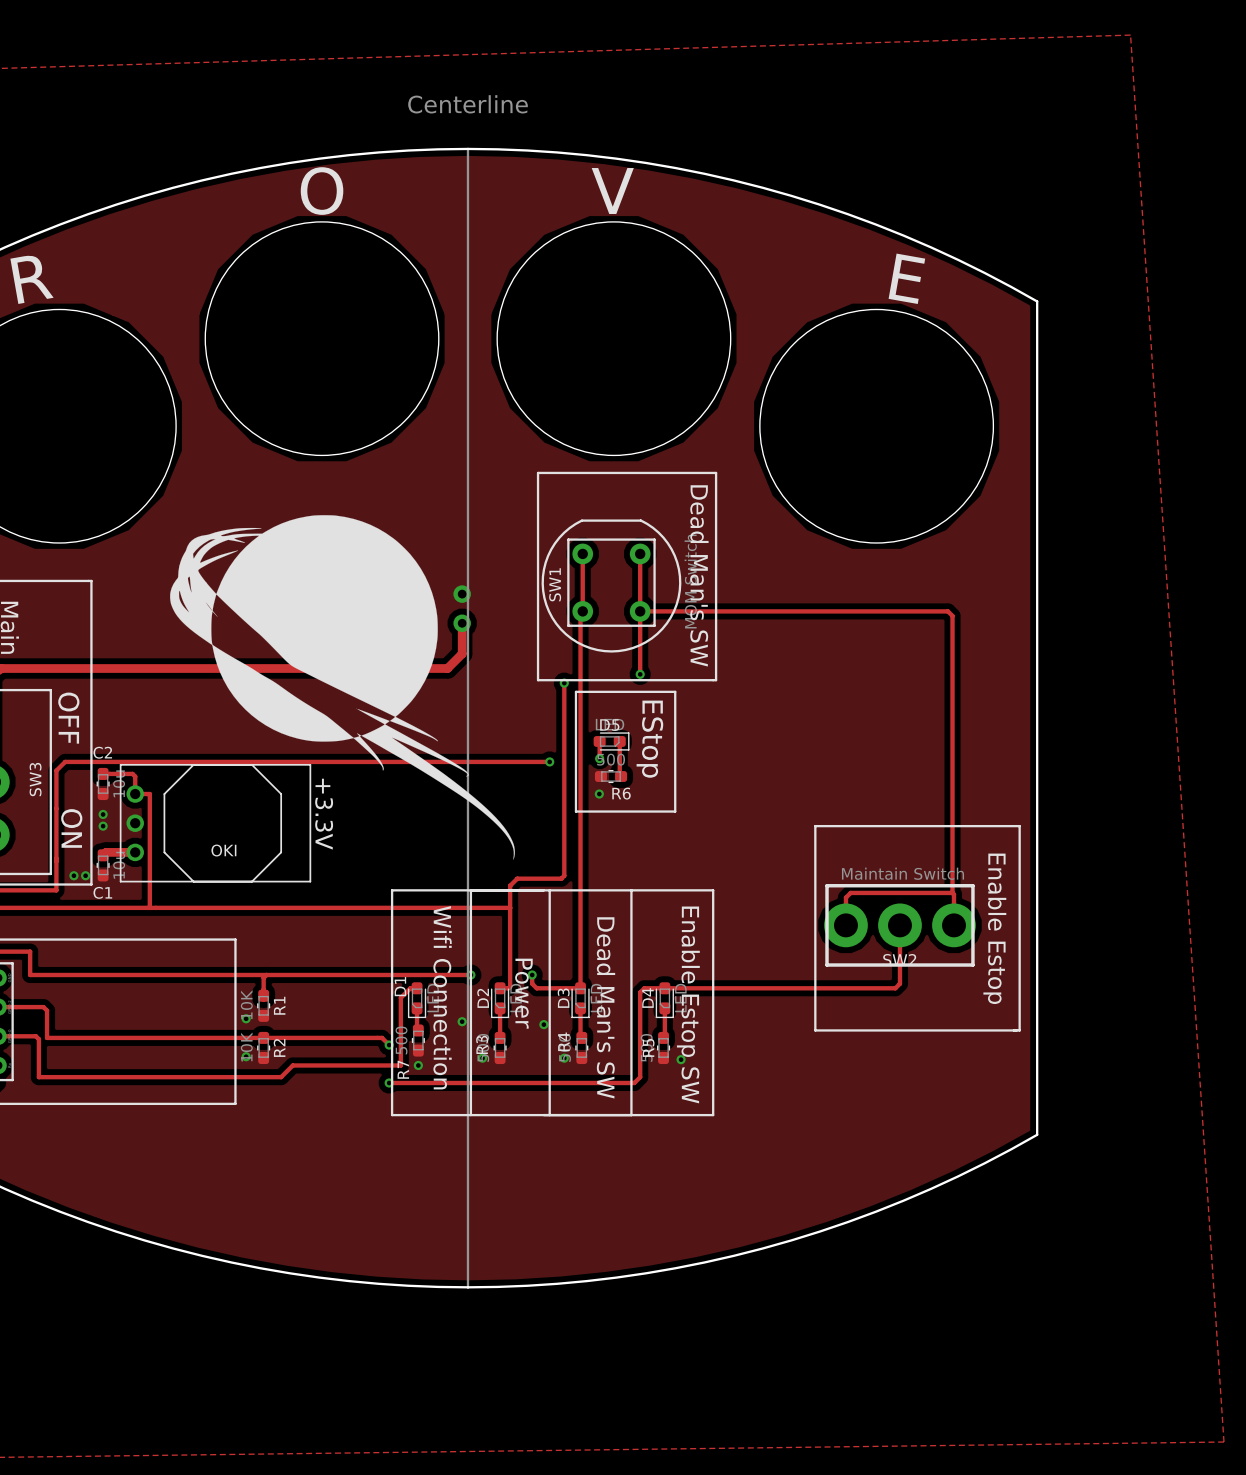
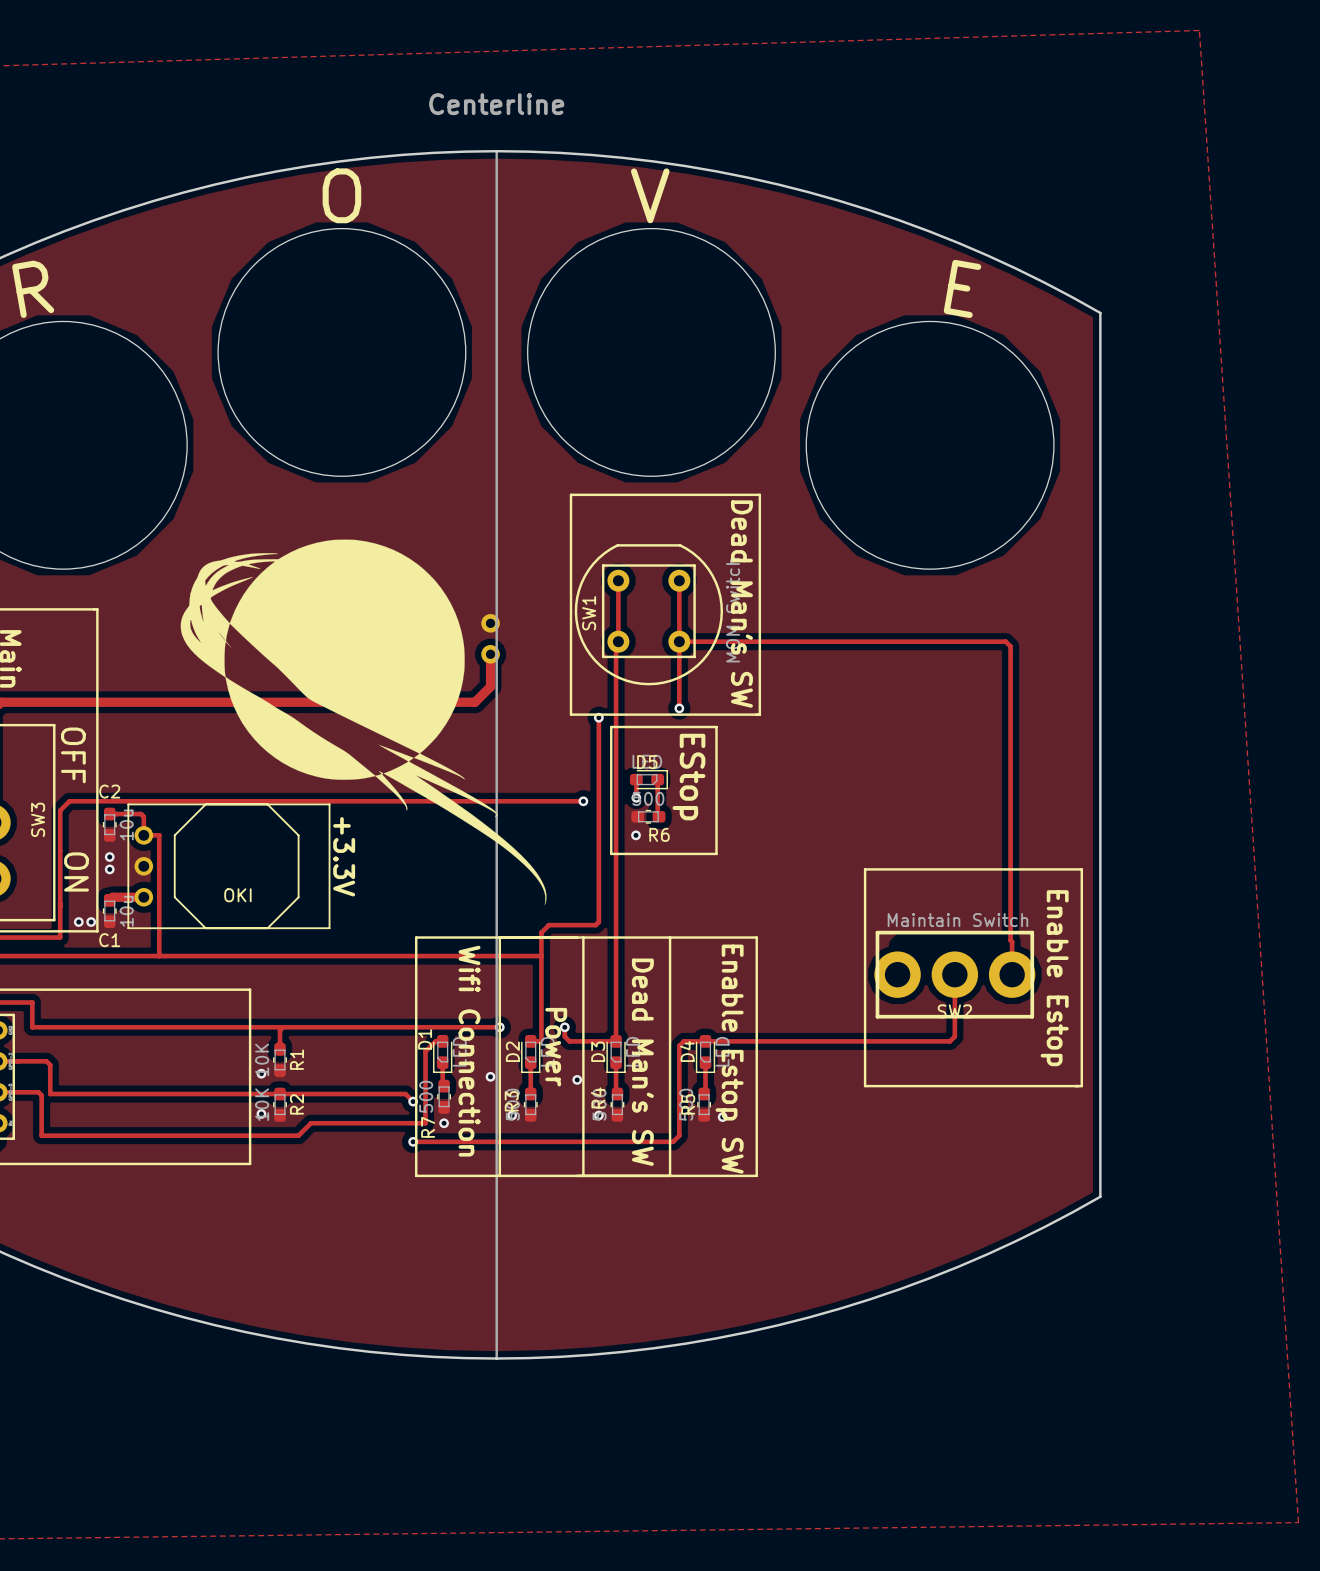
track: (952, 892) (850, 892) (845, 897) (845, 925) -> none

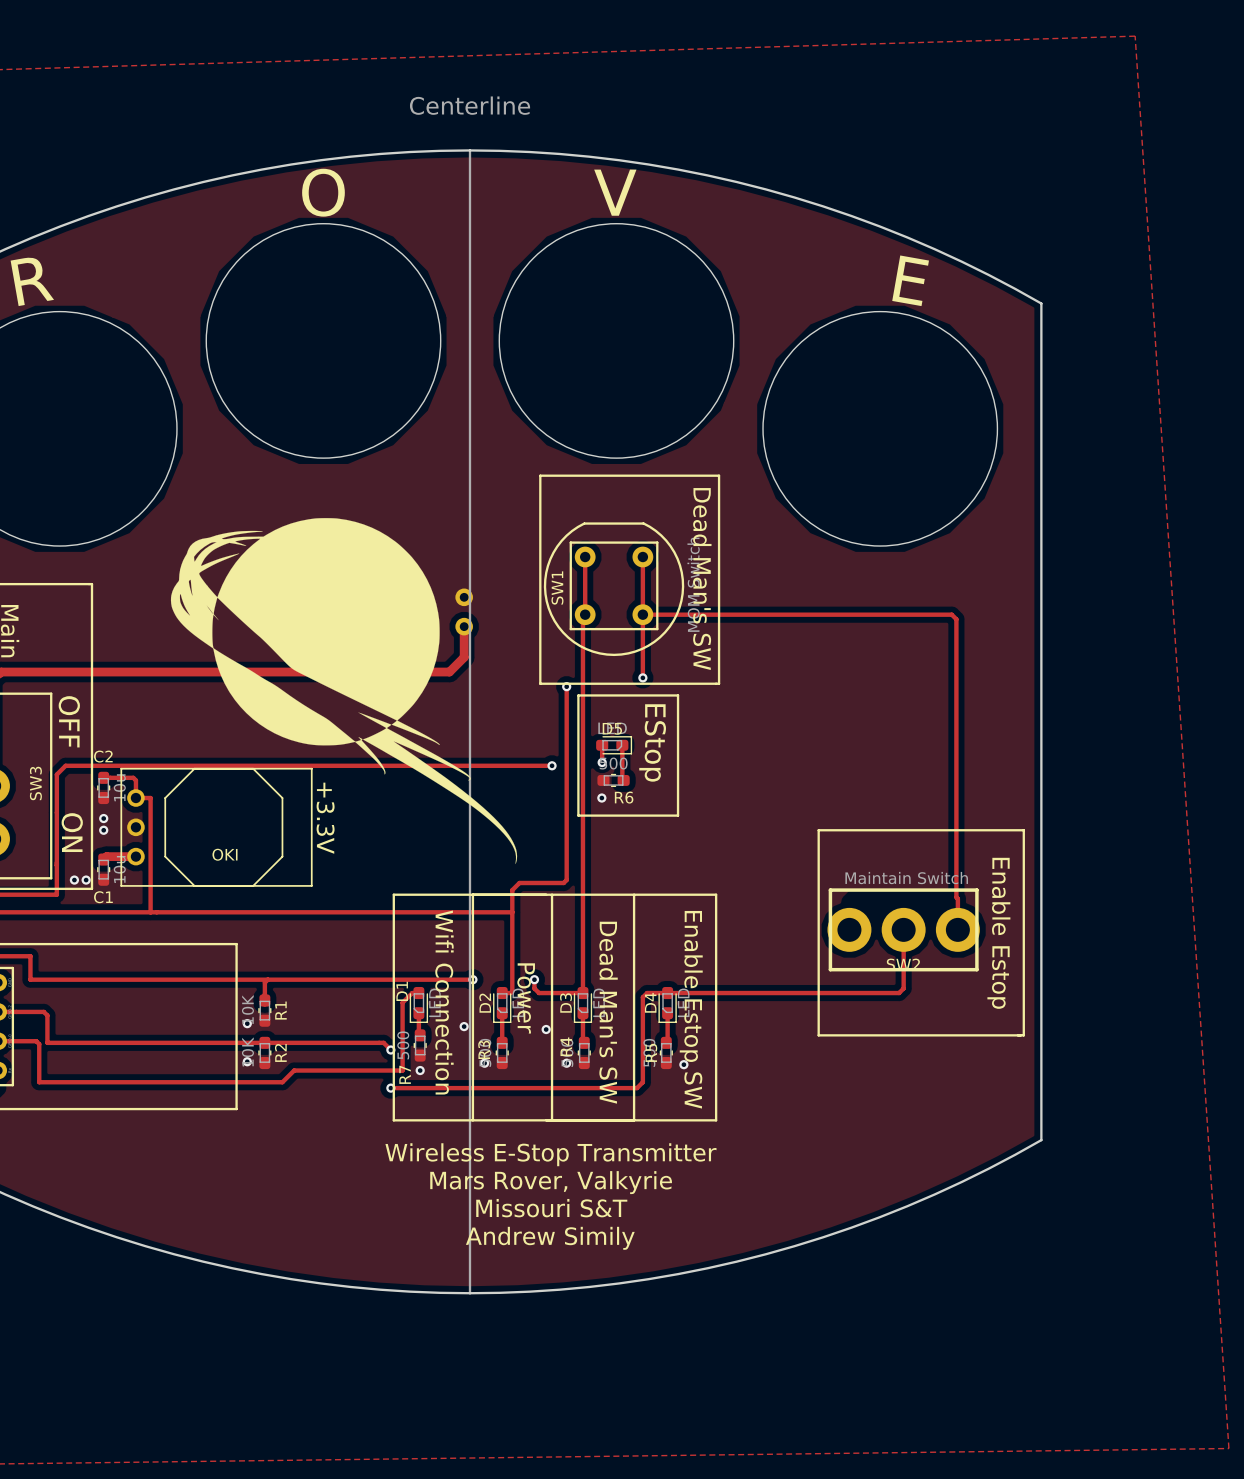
text: none -> Wireless E-Stop Transmitter (550, 1154)
text: none -> Mars Rover, Valkyrie (551, 1182)
text: none -> Missouri S&T (551, 1208)
text: none -> Andrew Simily (550, 1238)

